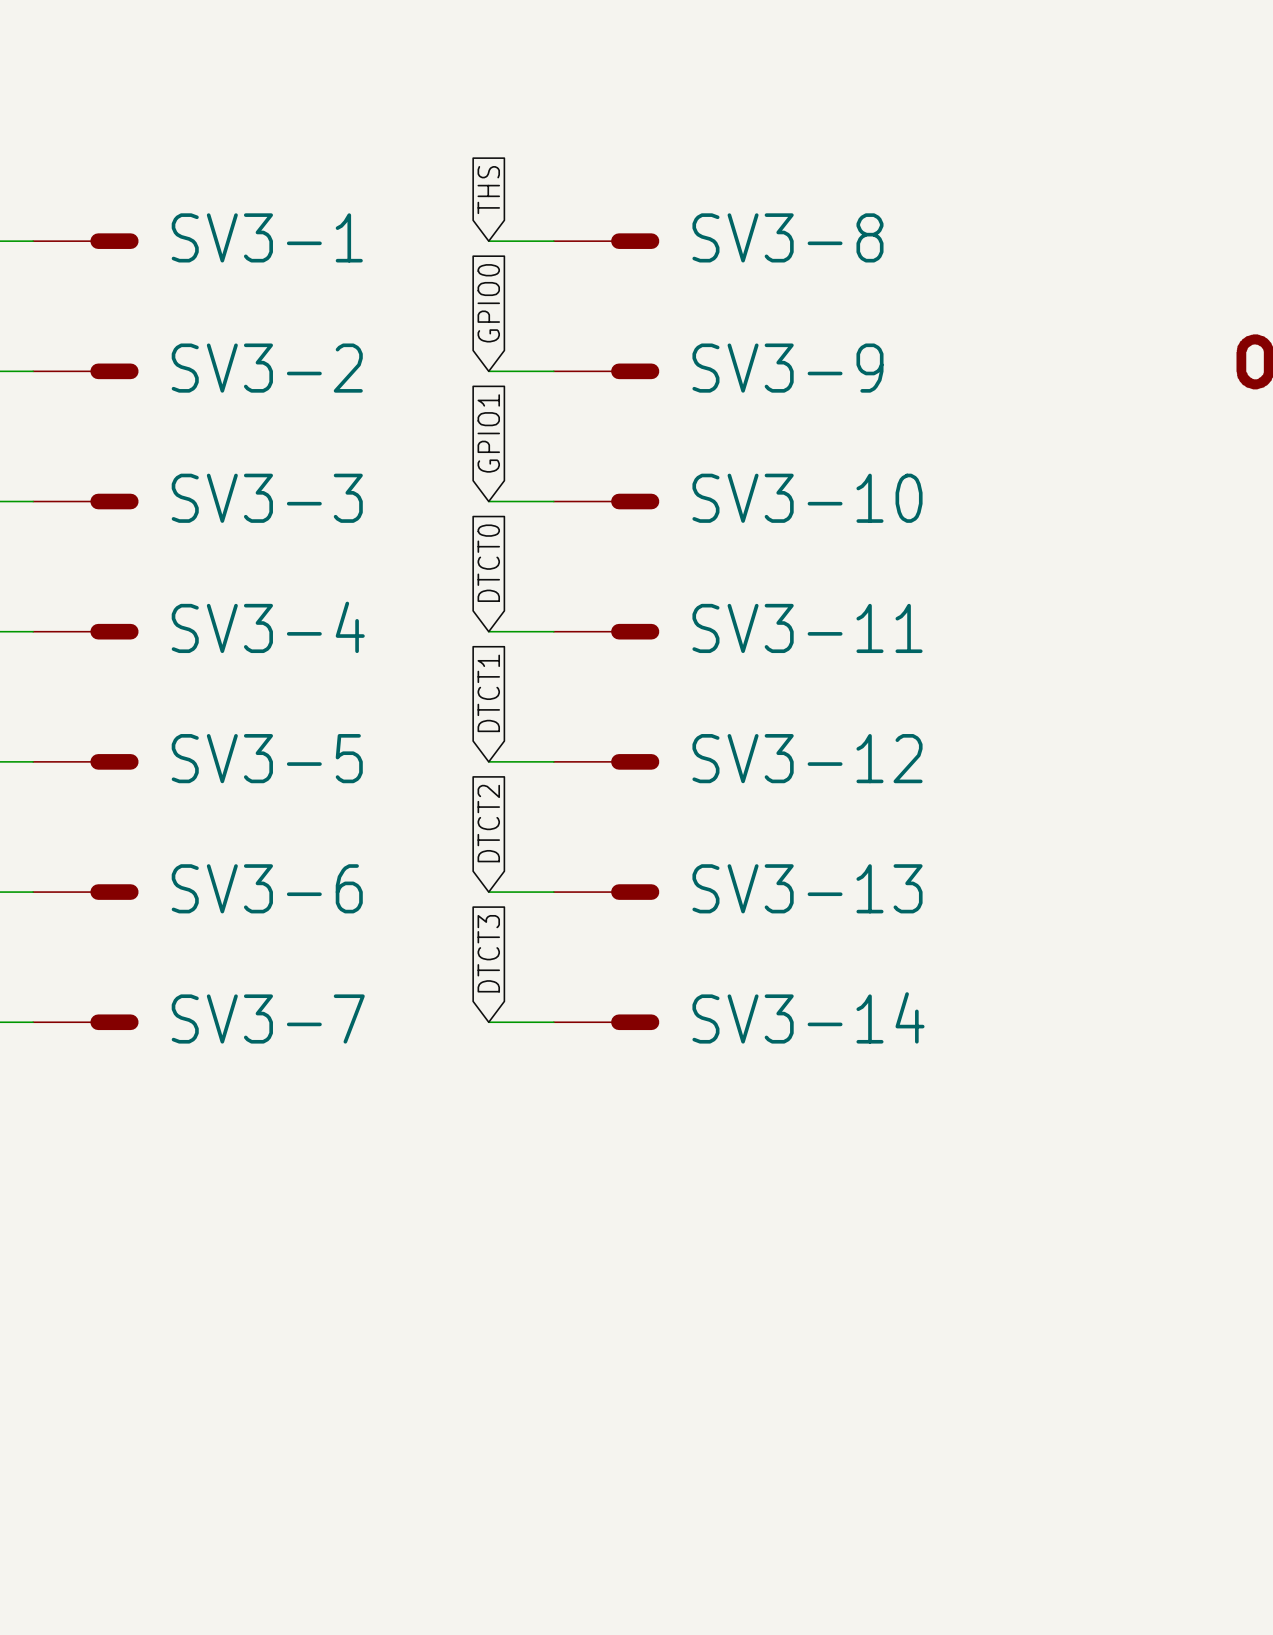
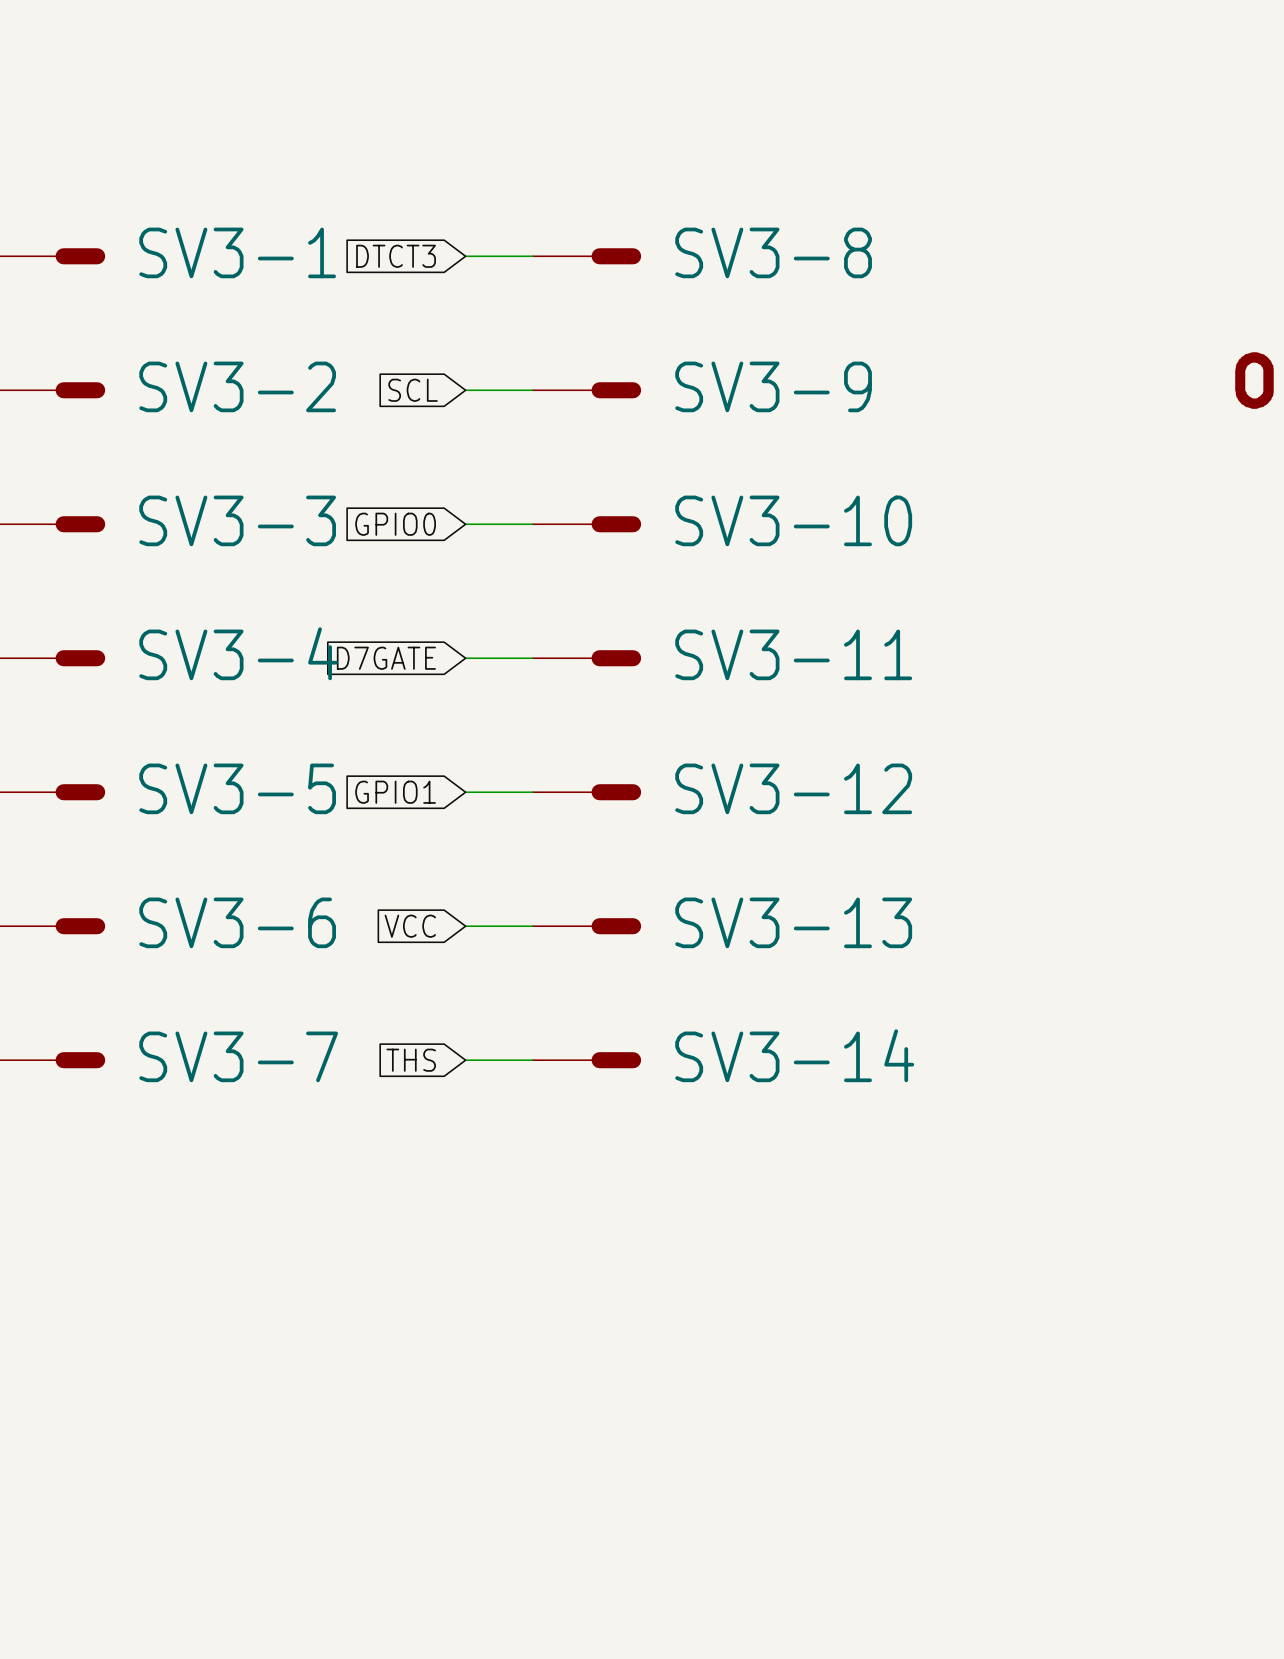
global label: THS (488, 190) -> DTCT3 (396, 256)
global label: GPIO0 (488, 303) -> SCL (413, 390)
global label: GPIO1 (488, 433) -> GPIO0 (395, 524)
global label: DTCT0 (488, 563) -> D7GATE (386, 658)
global label: DTCT1 (488, 693) -> GPIO1 (395, 792)
global label: DTCT2 (488, 823) -> VCC (410, 926)
global label: DTCT3 (488, 953) -> THS (411, 1060)

